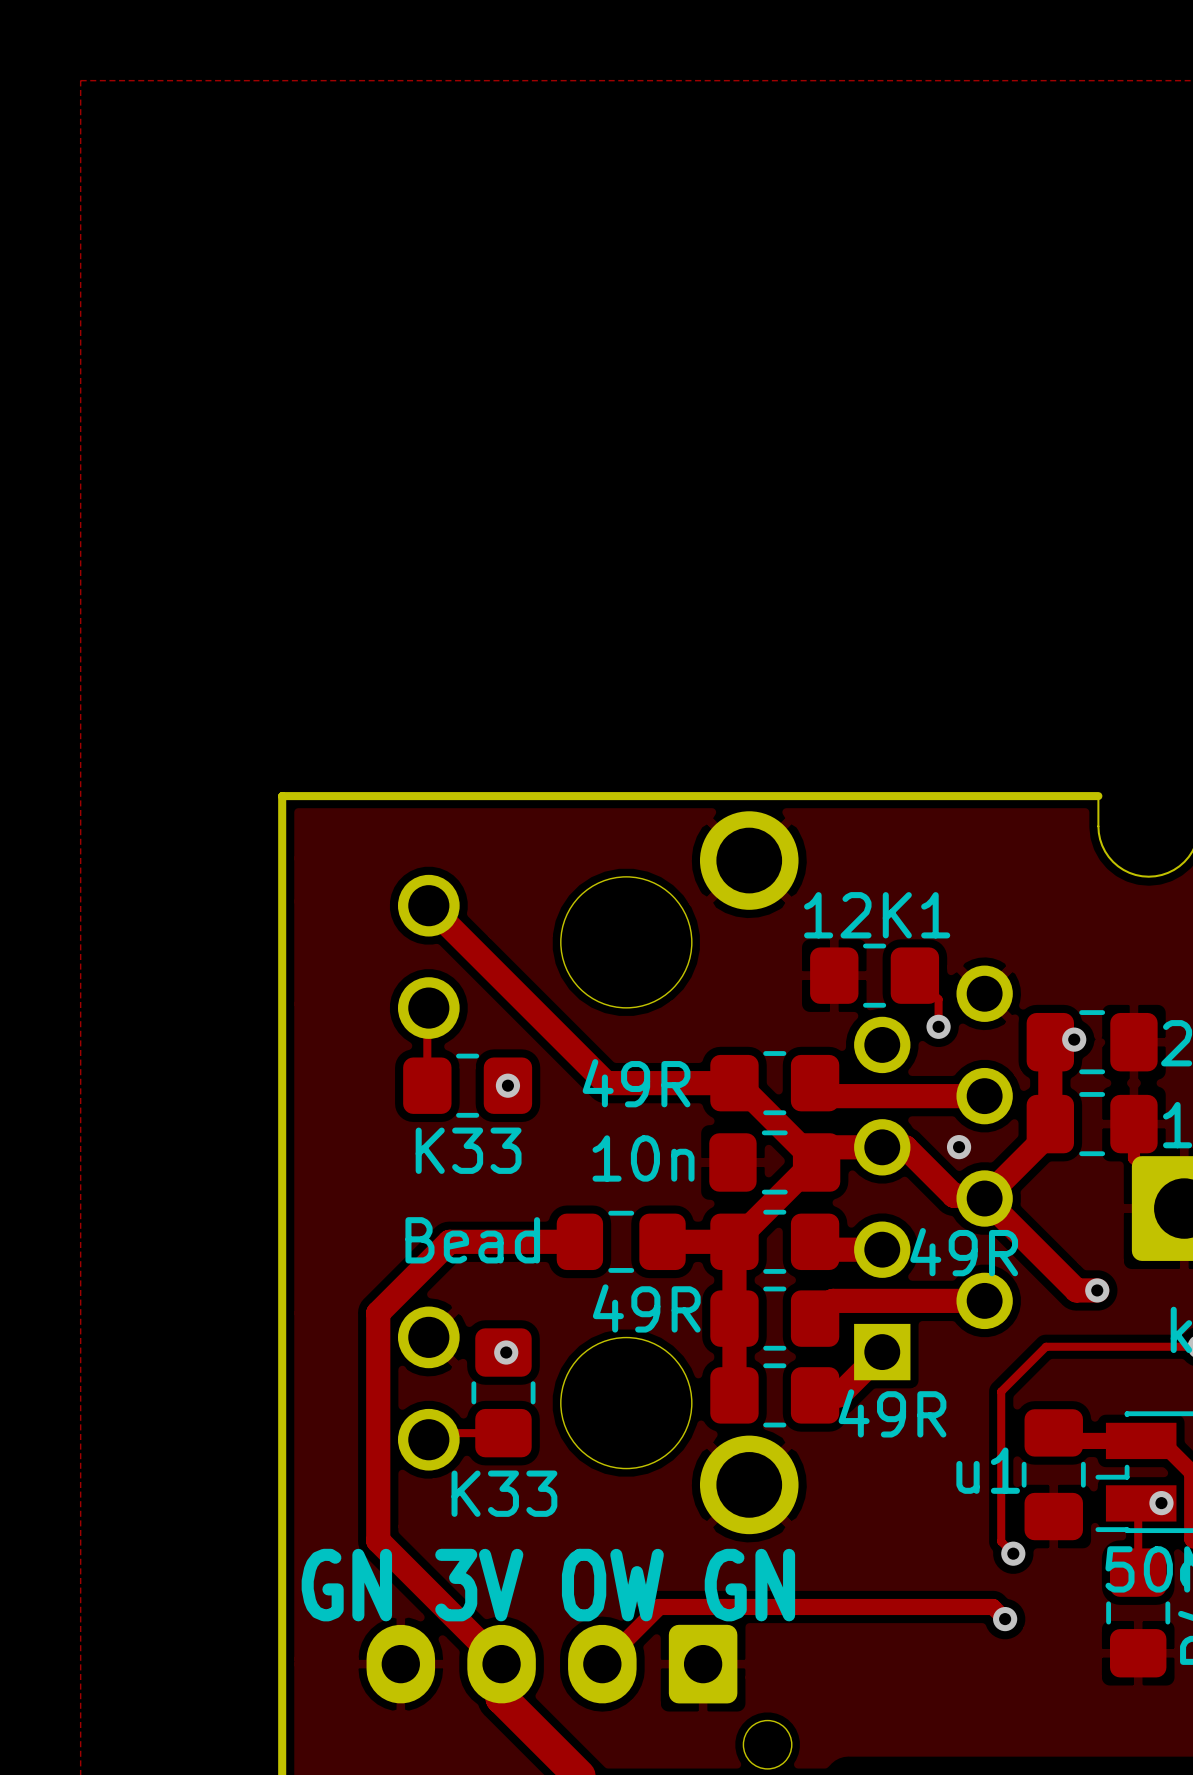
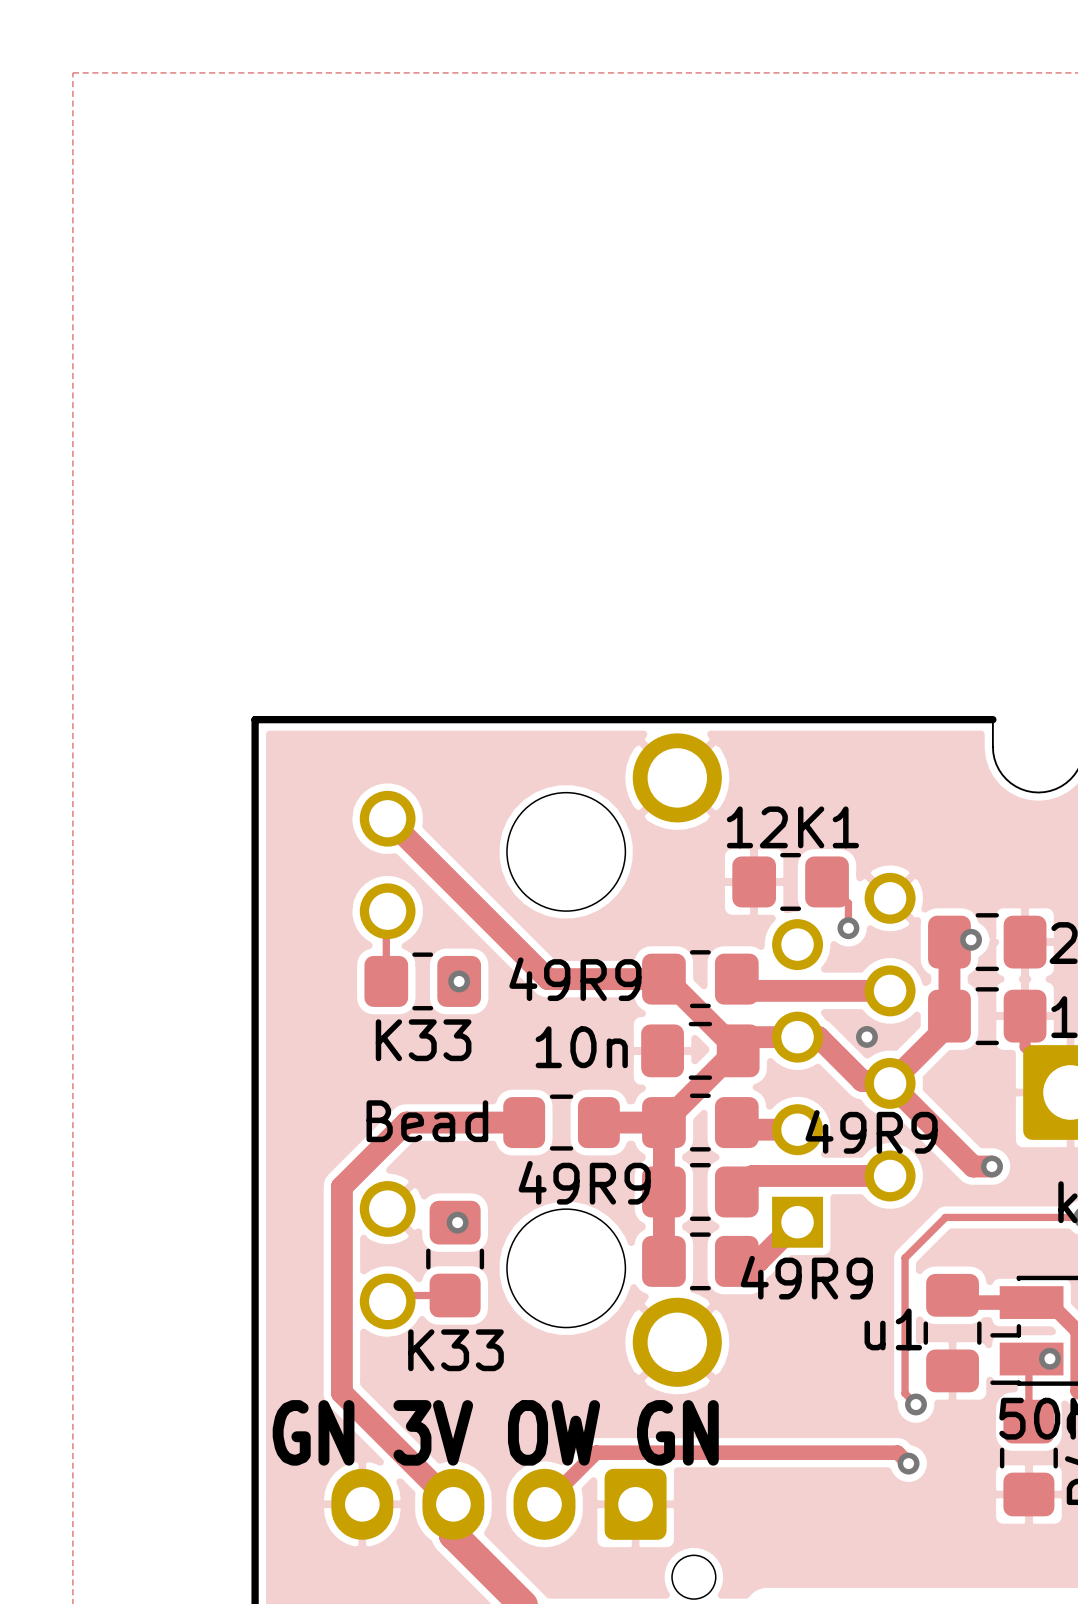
part value: 49R (636, 1083) -> 49R9 (575, 979)
part value: 49R (964, 1252) -> 49R9 (871, 1131)
part value: 49R (646, 1308) -> 49R9 (584, 1182)
part value: 49R (892, 1413) -> 49R9 (806, 1277)

